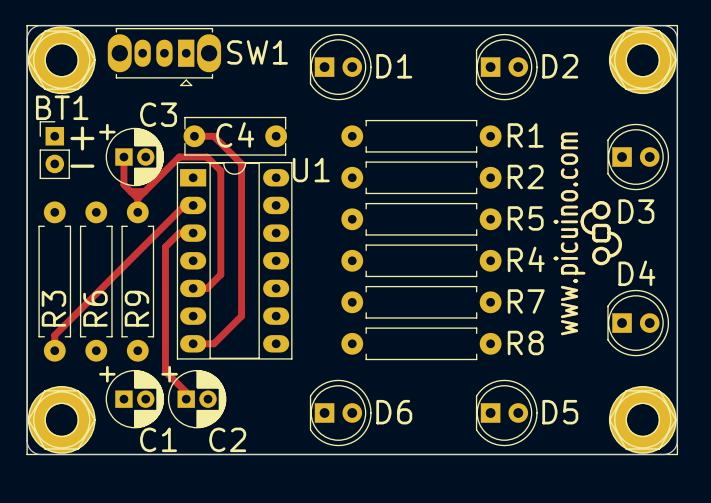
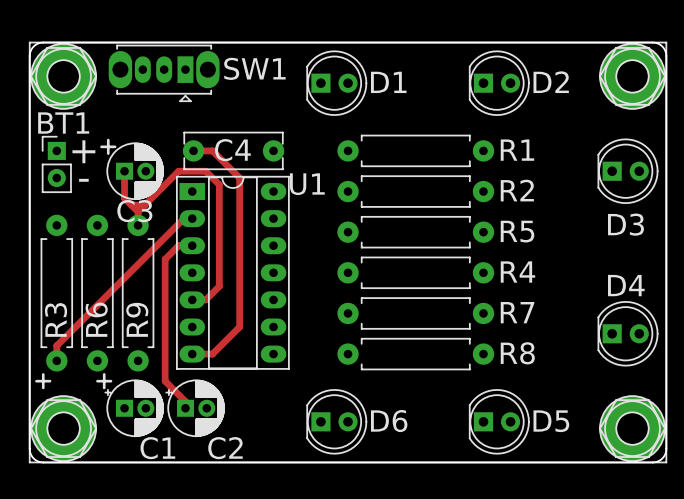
C3 name position: C3 (158, 114) -> C3 (134, 211)
drawing: [580, 200, 623, 266] -> none
line: none -> (43, 374) (43, 387)
line: none -> (104, 374) (104, 387)
C1 footprint: [99, 365, 165, 429] -> [104, 379, 164, 437]
C2 footprint: [161, 365, 227, 429] -> [165, 379, 225, 437]
line: none -> (36, 381) (50, 381)
line: none -> (97, 381) (110, 381)

